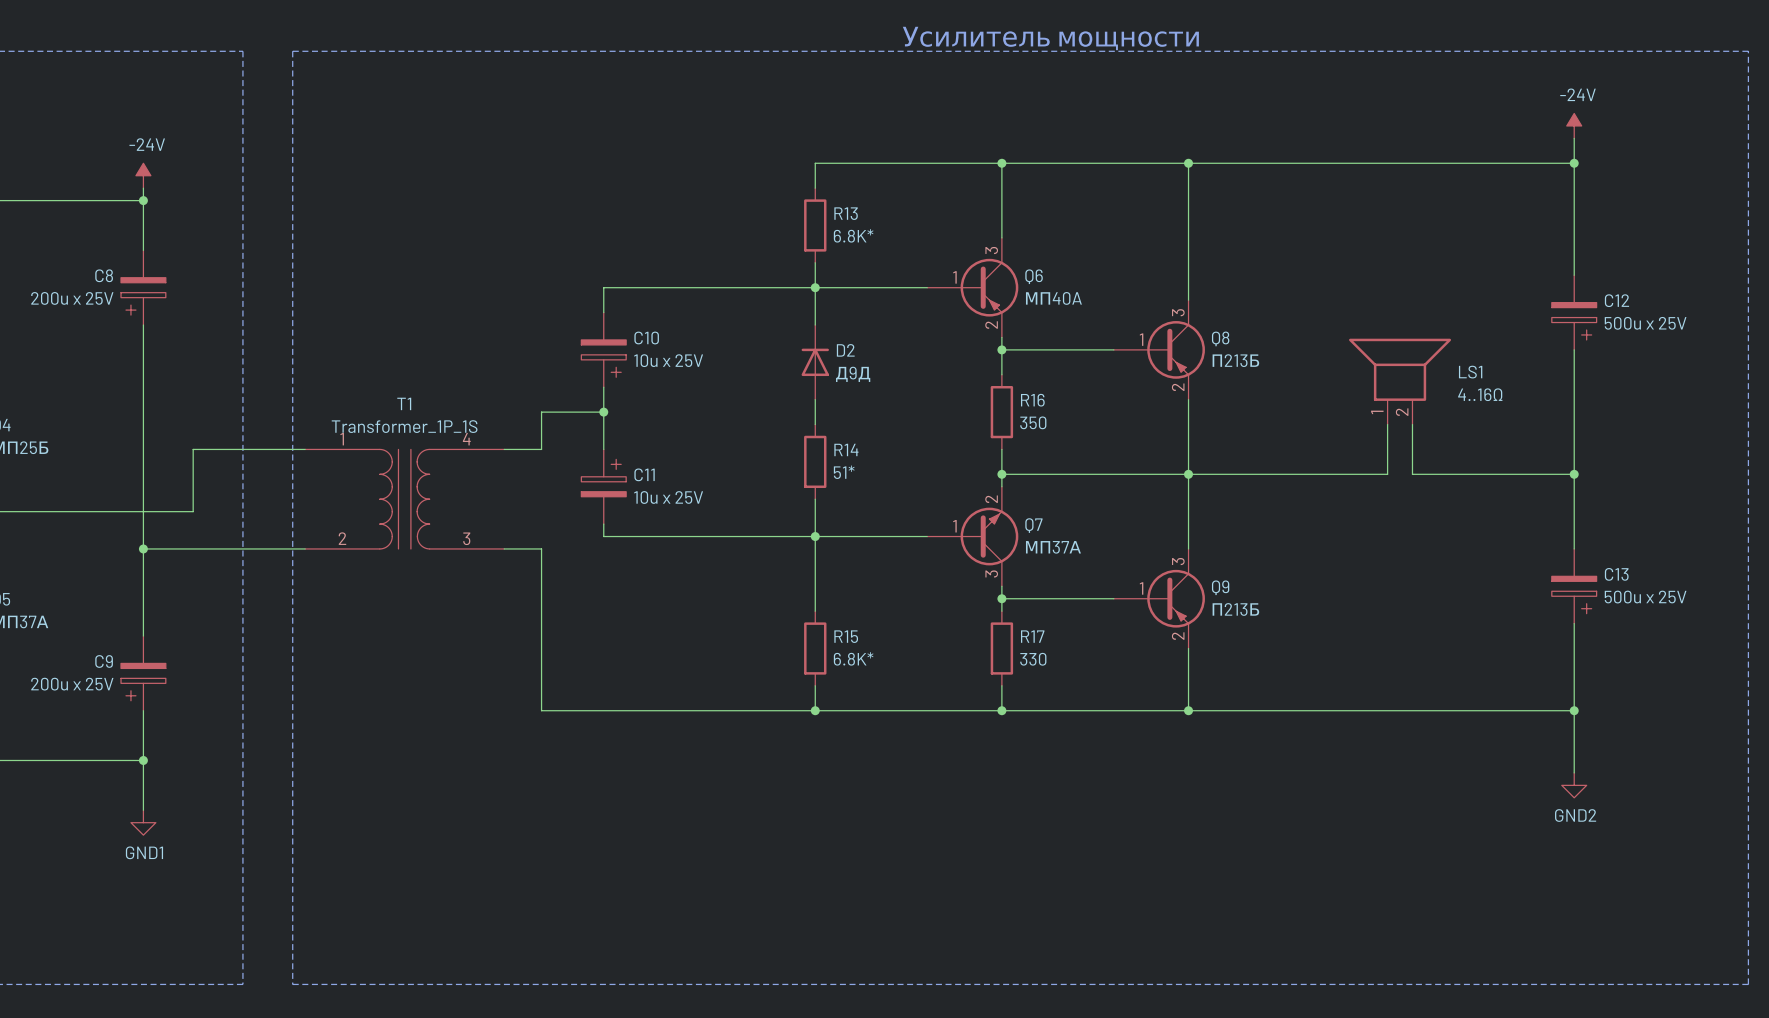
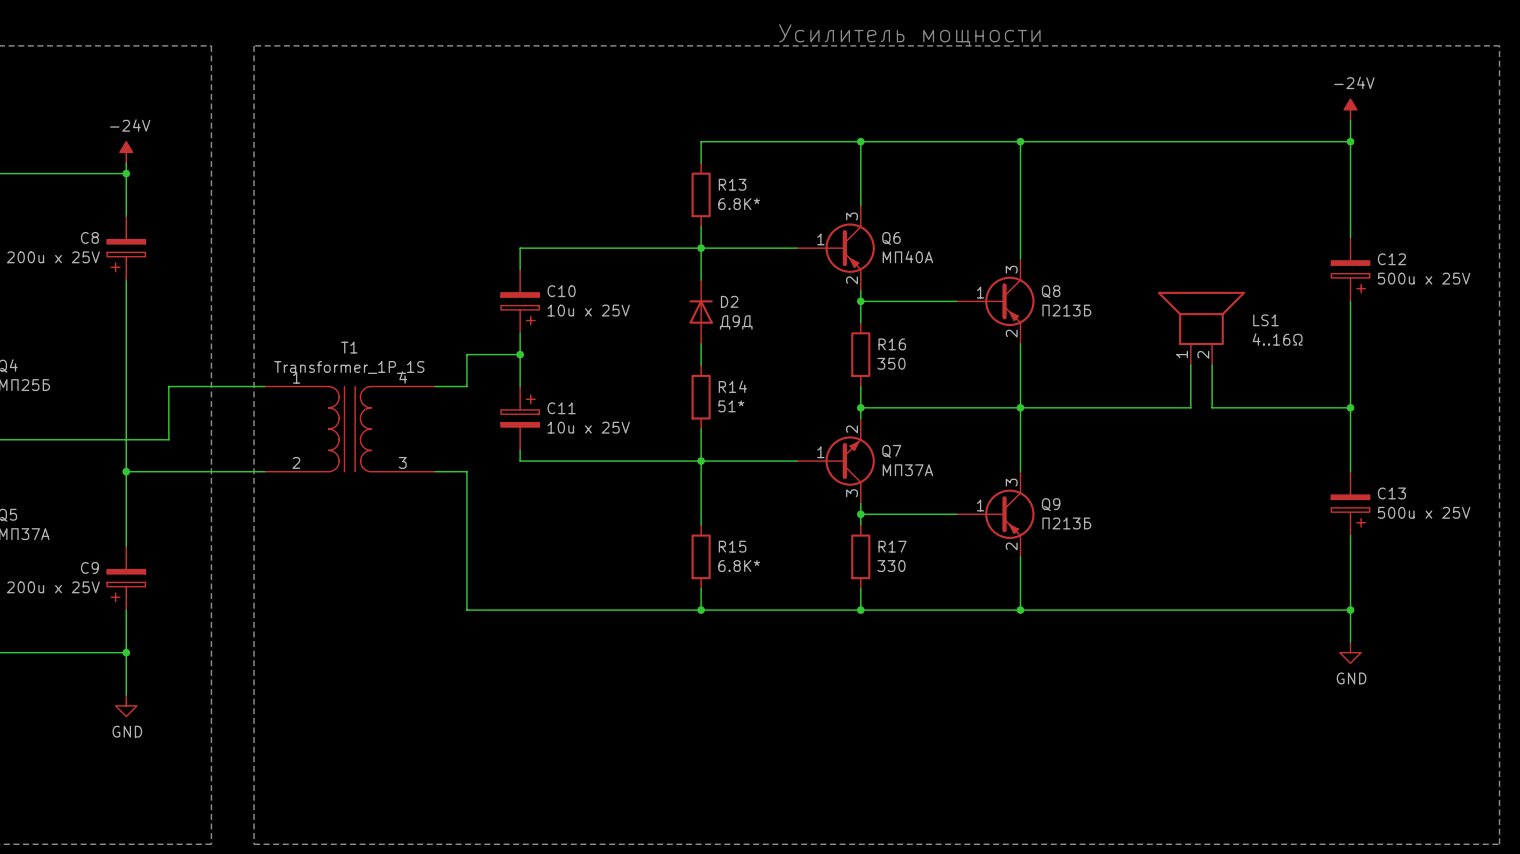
power symbol: none -> GND (1350, 652)
power symbol: GND2 (1574, 785) -> none
power symbol: GND1 (143, 822) -> GND (126, 705)

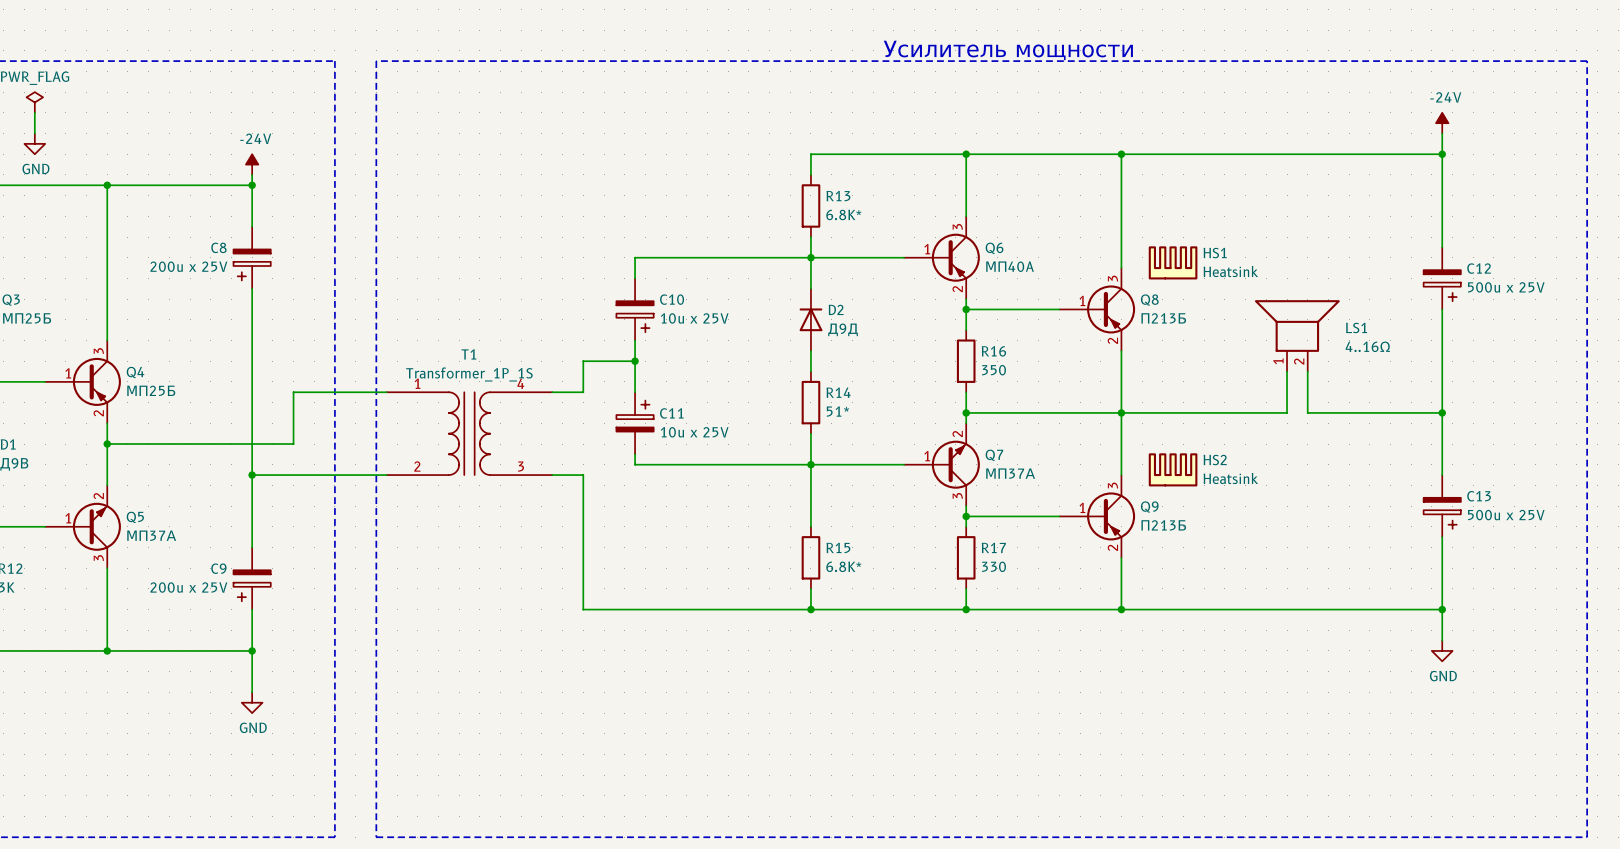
HS1: none -> Heatsink (1173, 262)
HS2: none -> Heatsink (1173, 469)

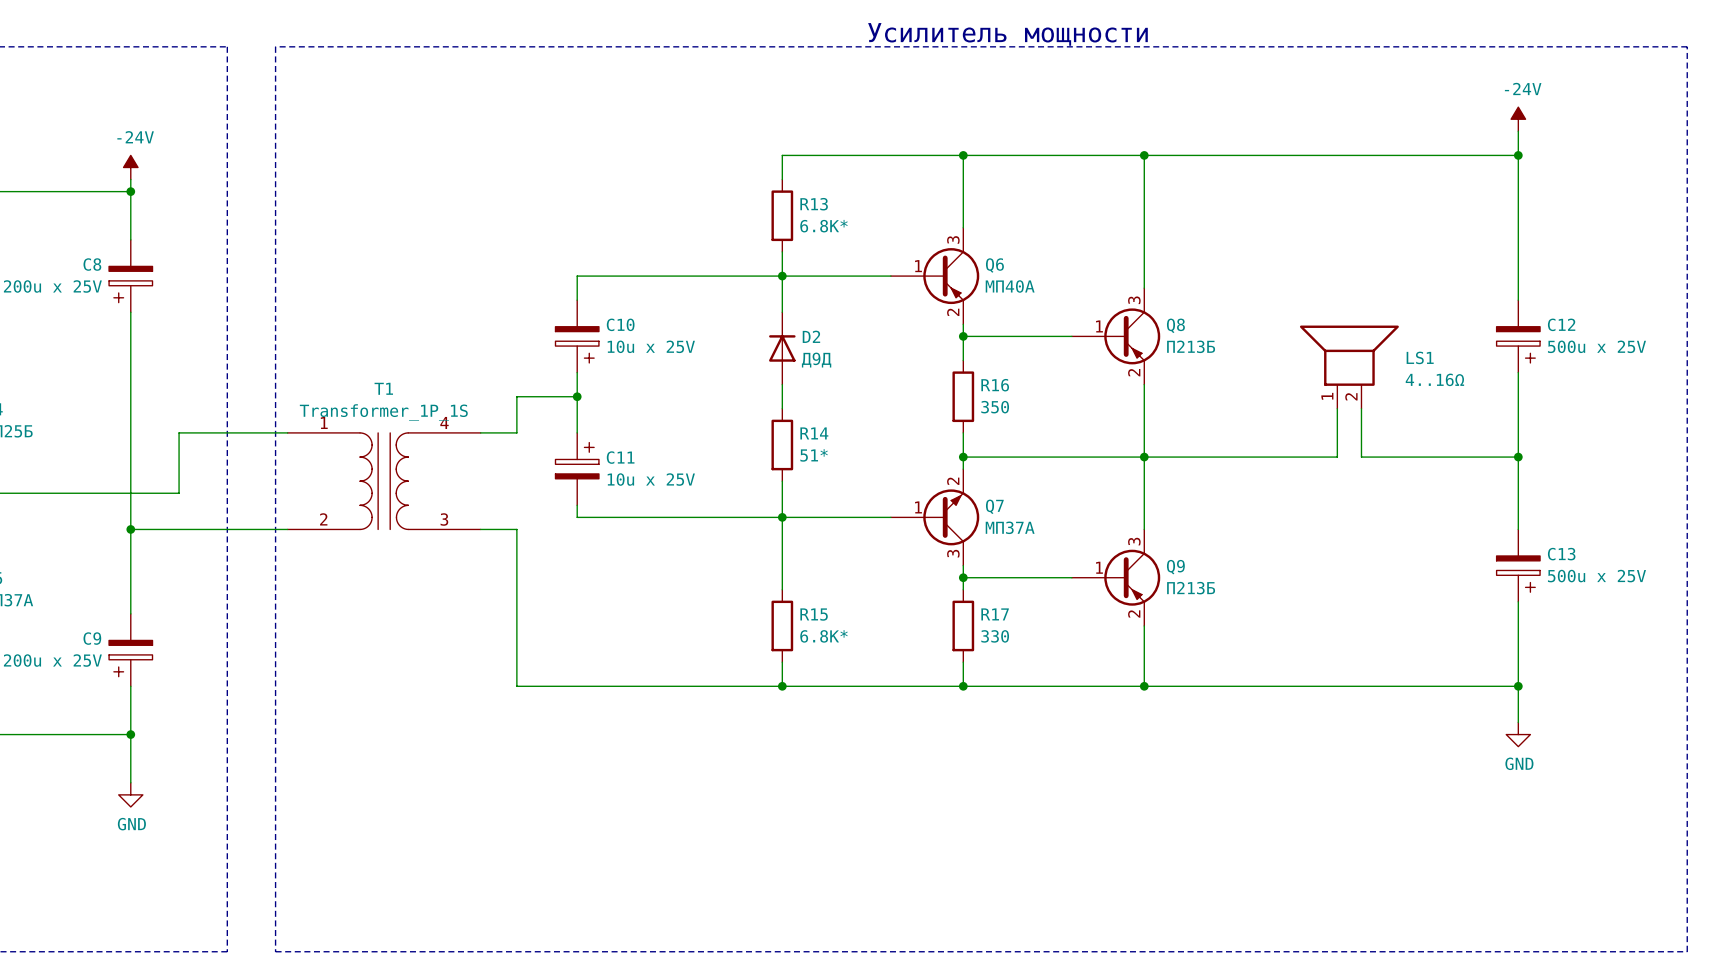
HS1: Heatsink (1173, 262) -> none
C12 position: (1442, 278) -> (1518, 336)
HS2: Heatsink (1173, 469) -> none

